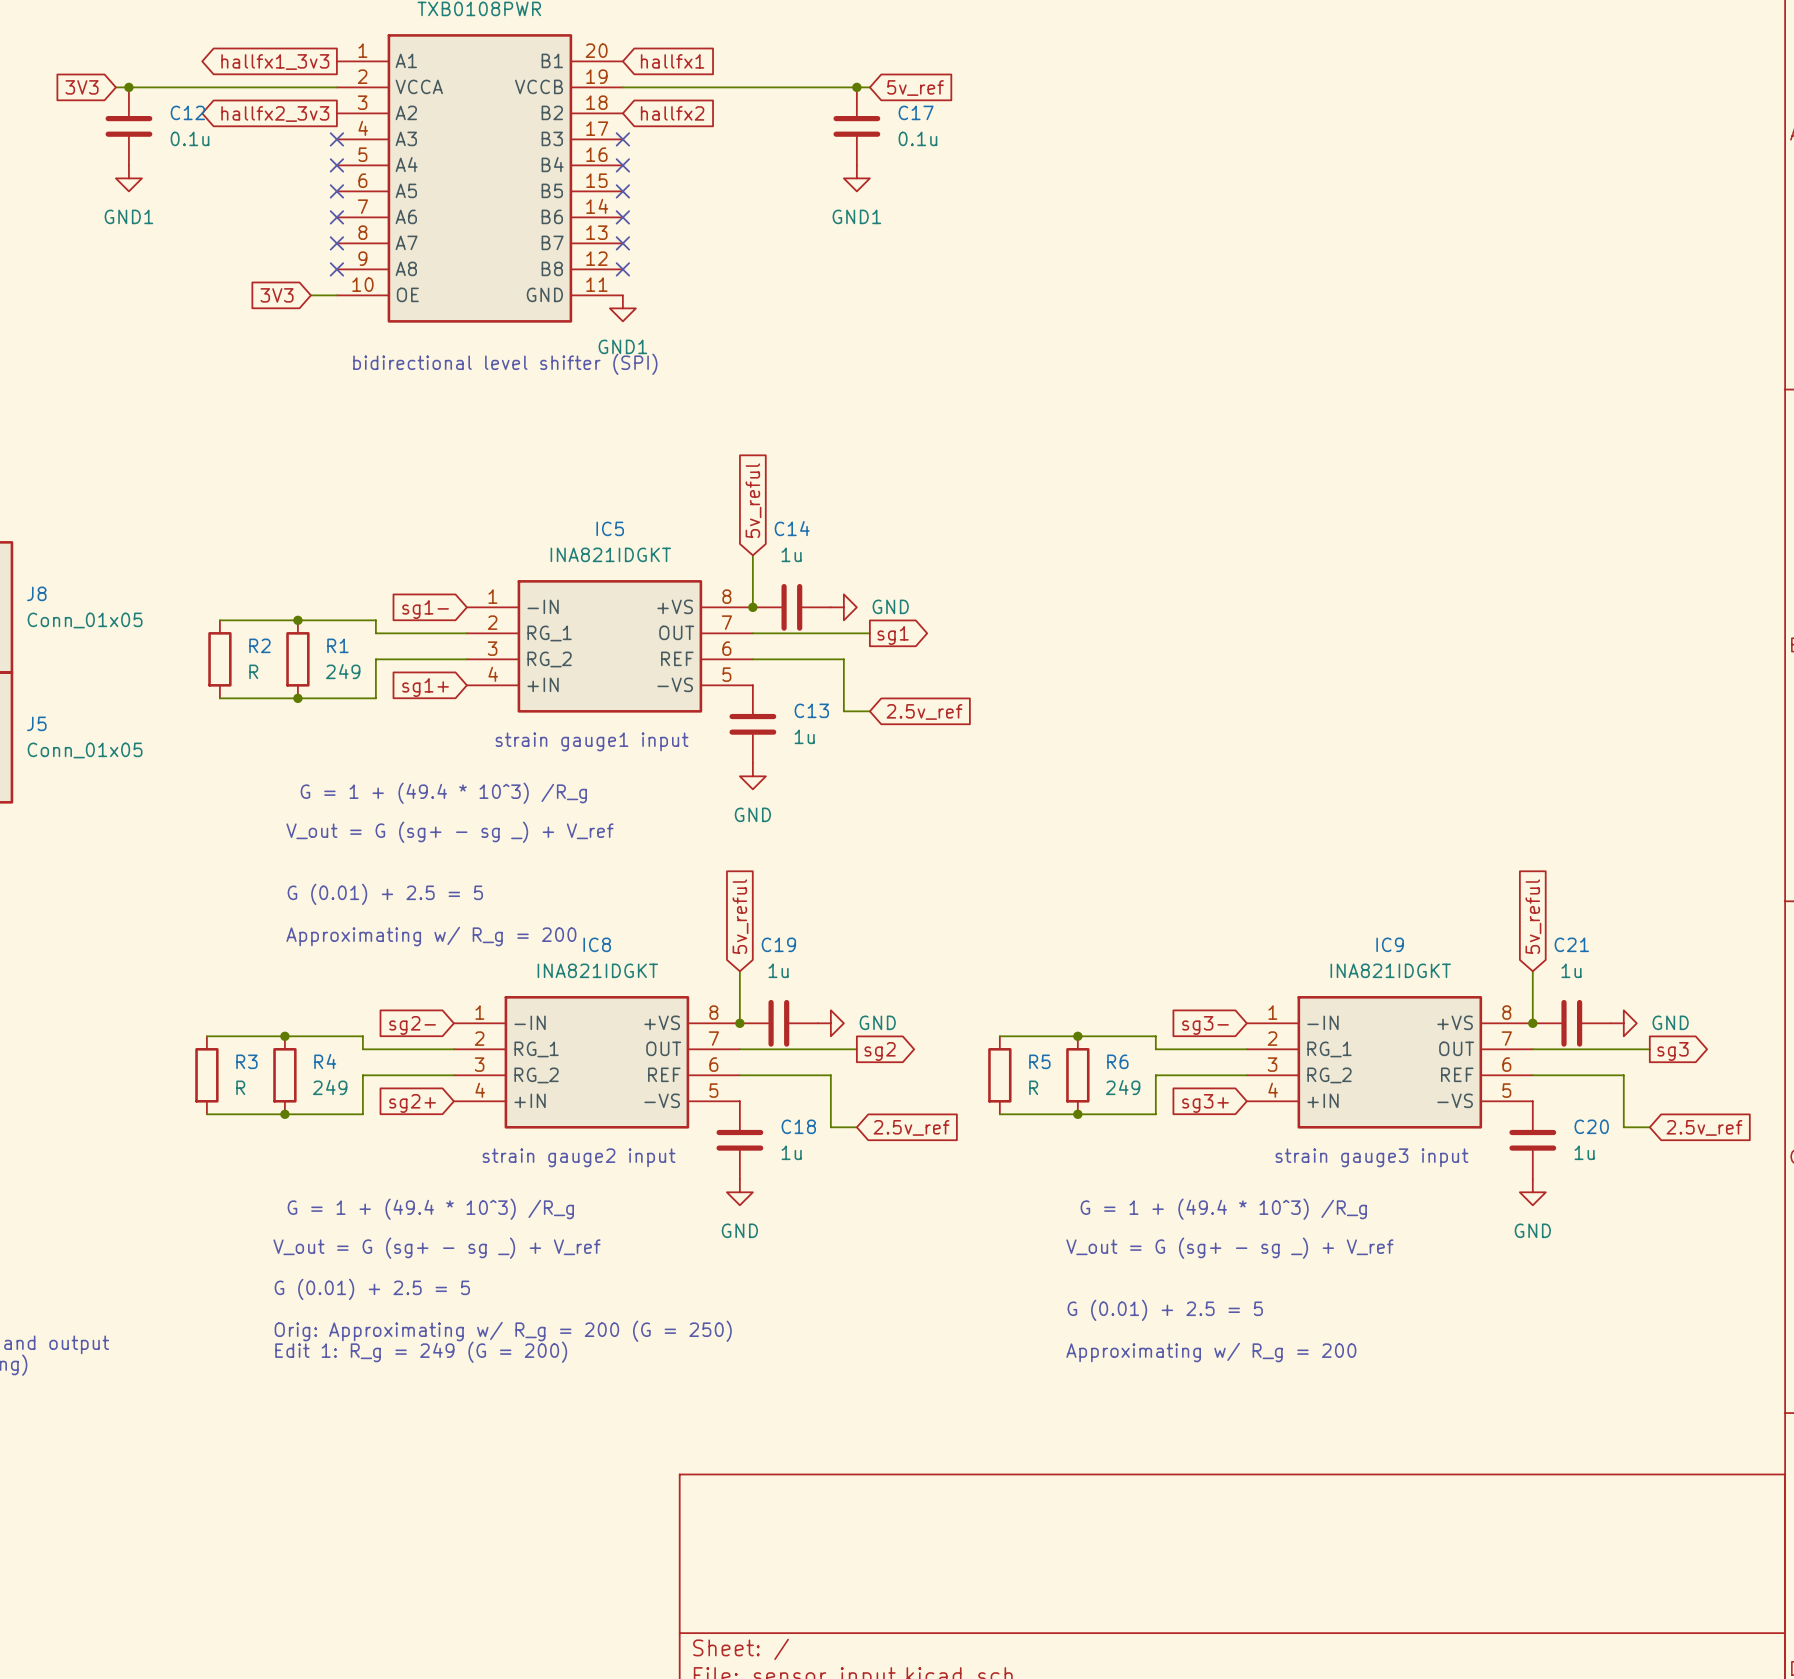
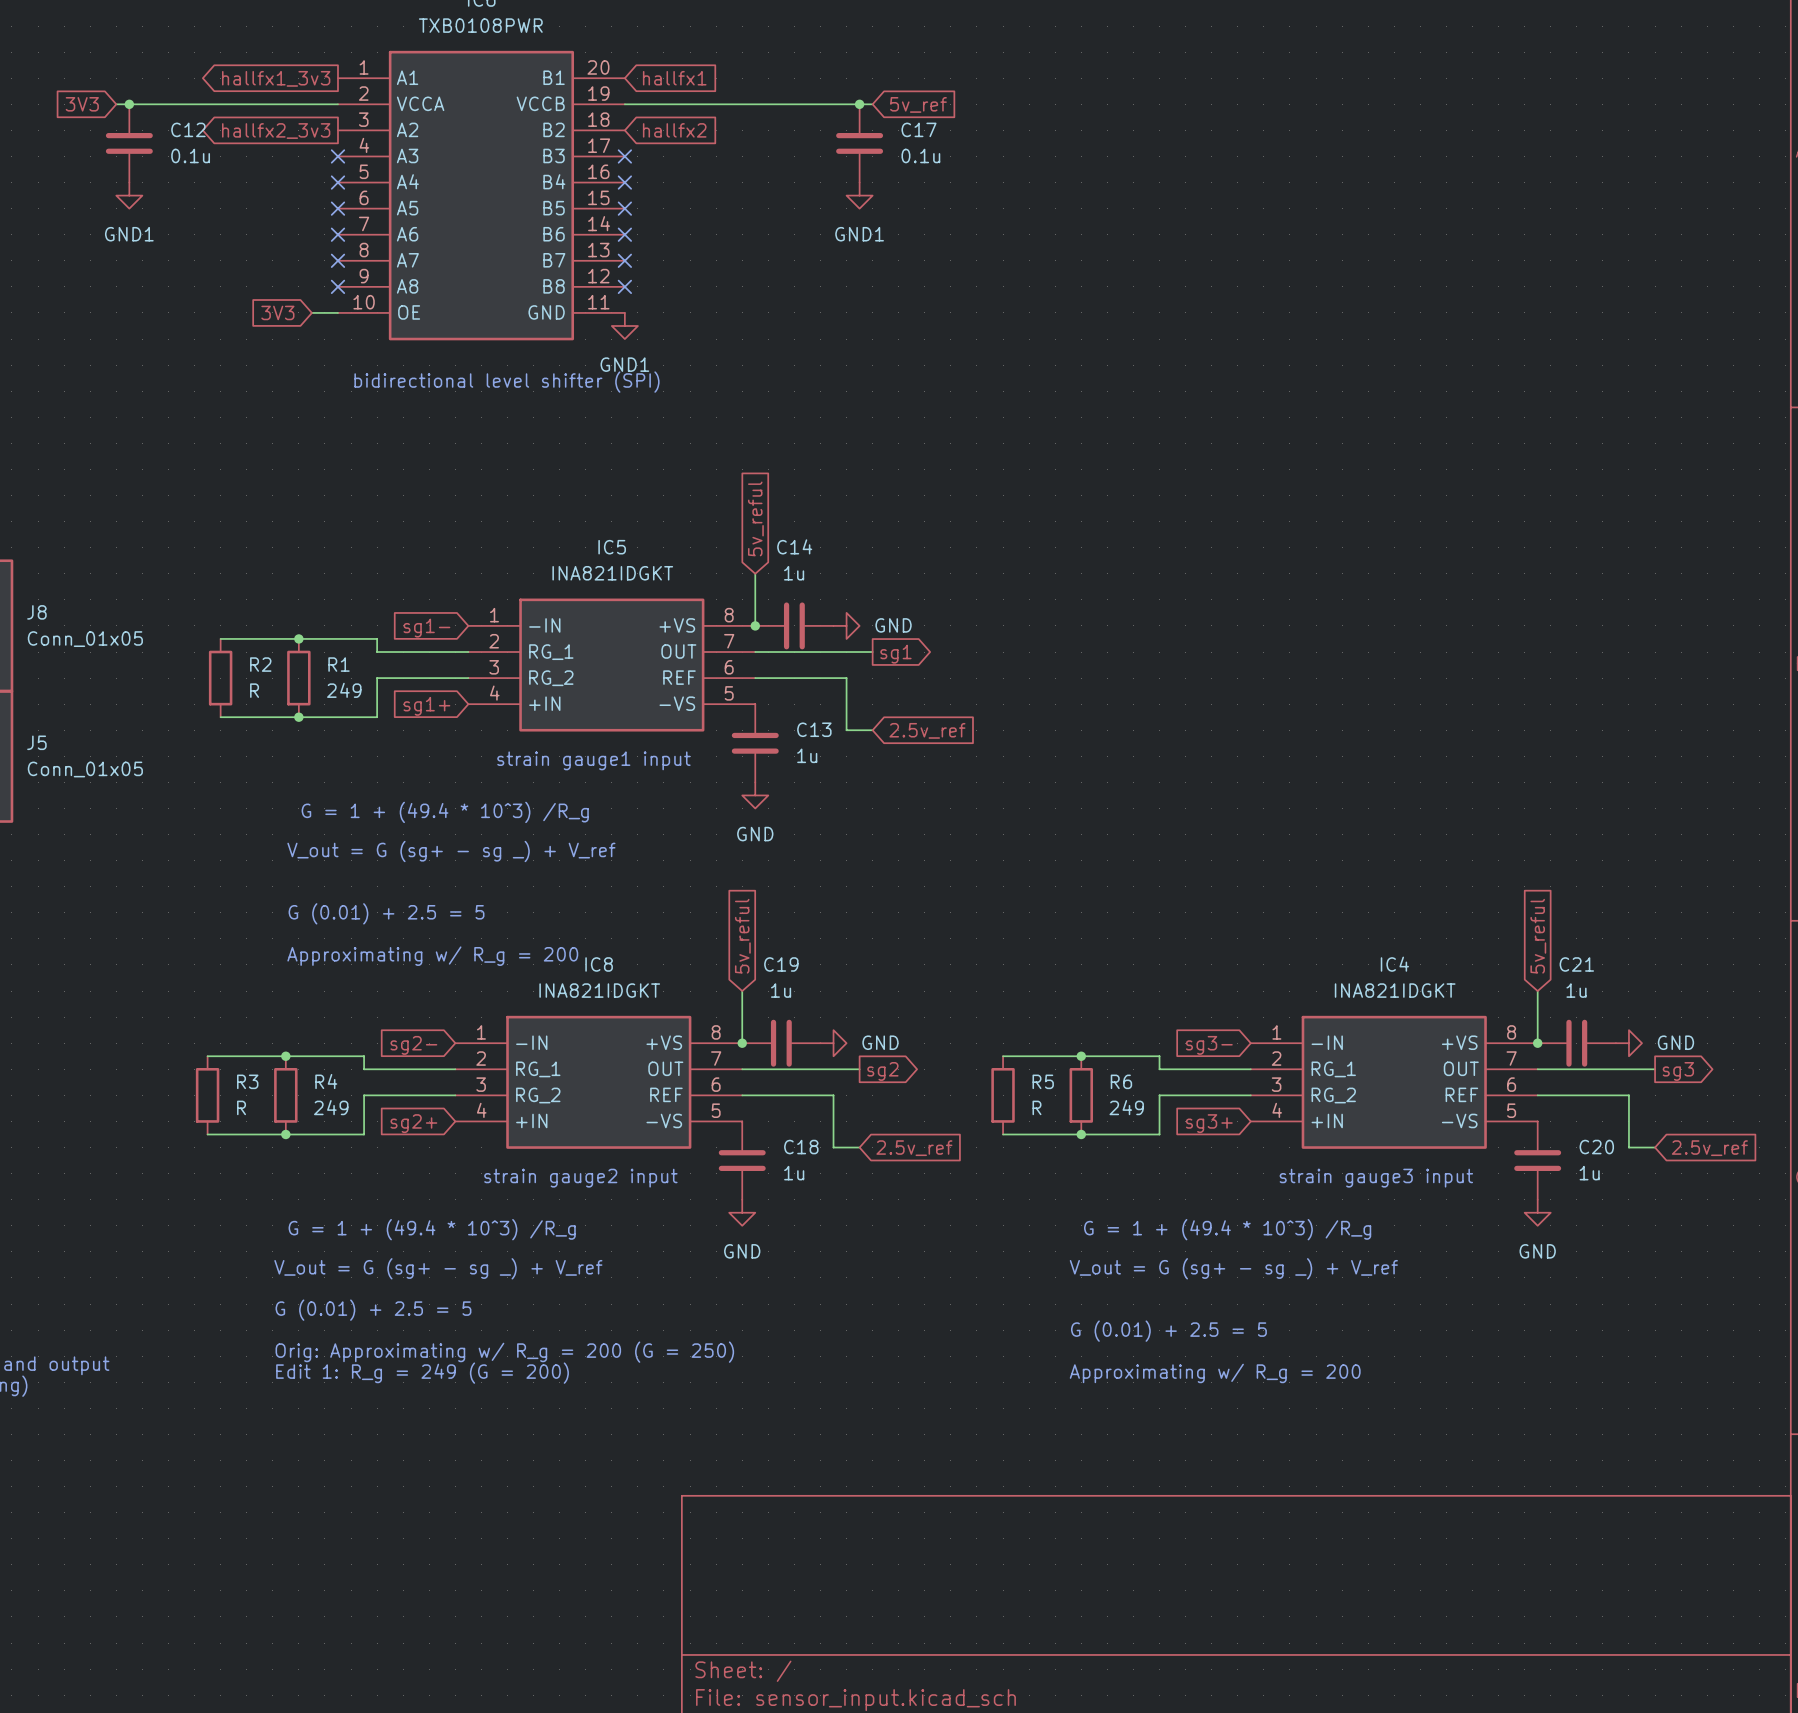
IC9 name: IC9 (1390, 944) -> IC4 (1394, 964)

